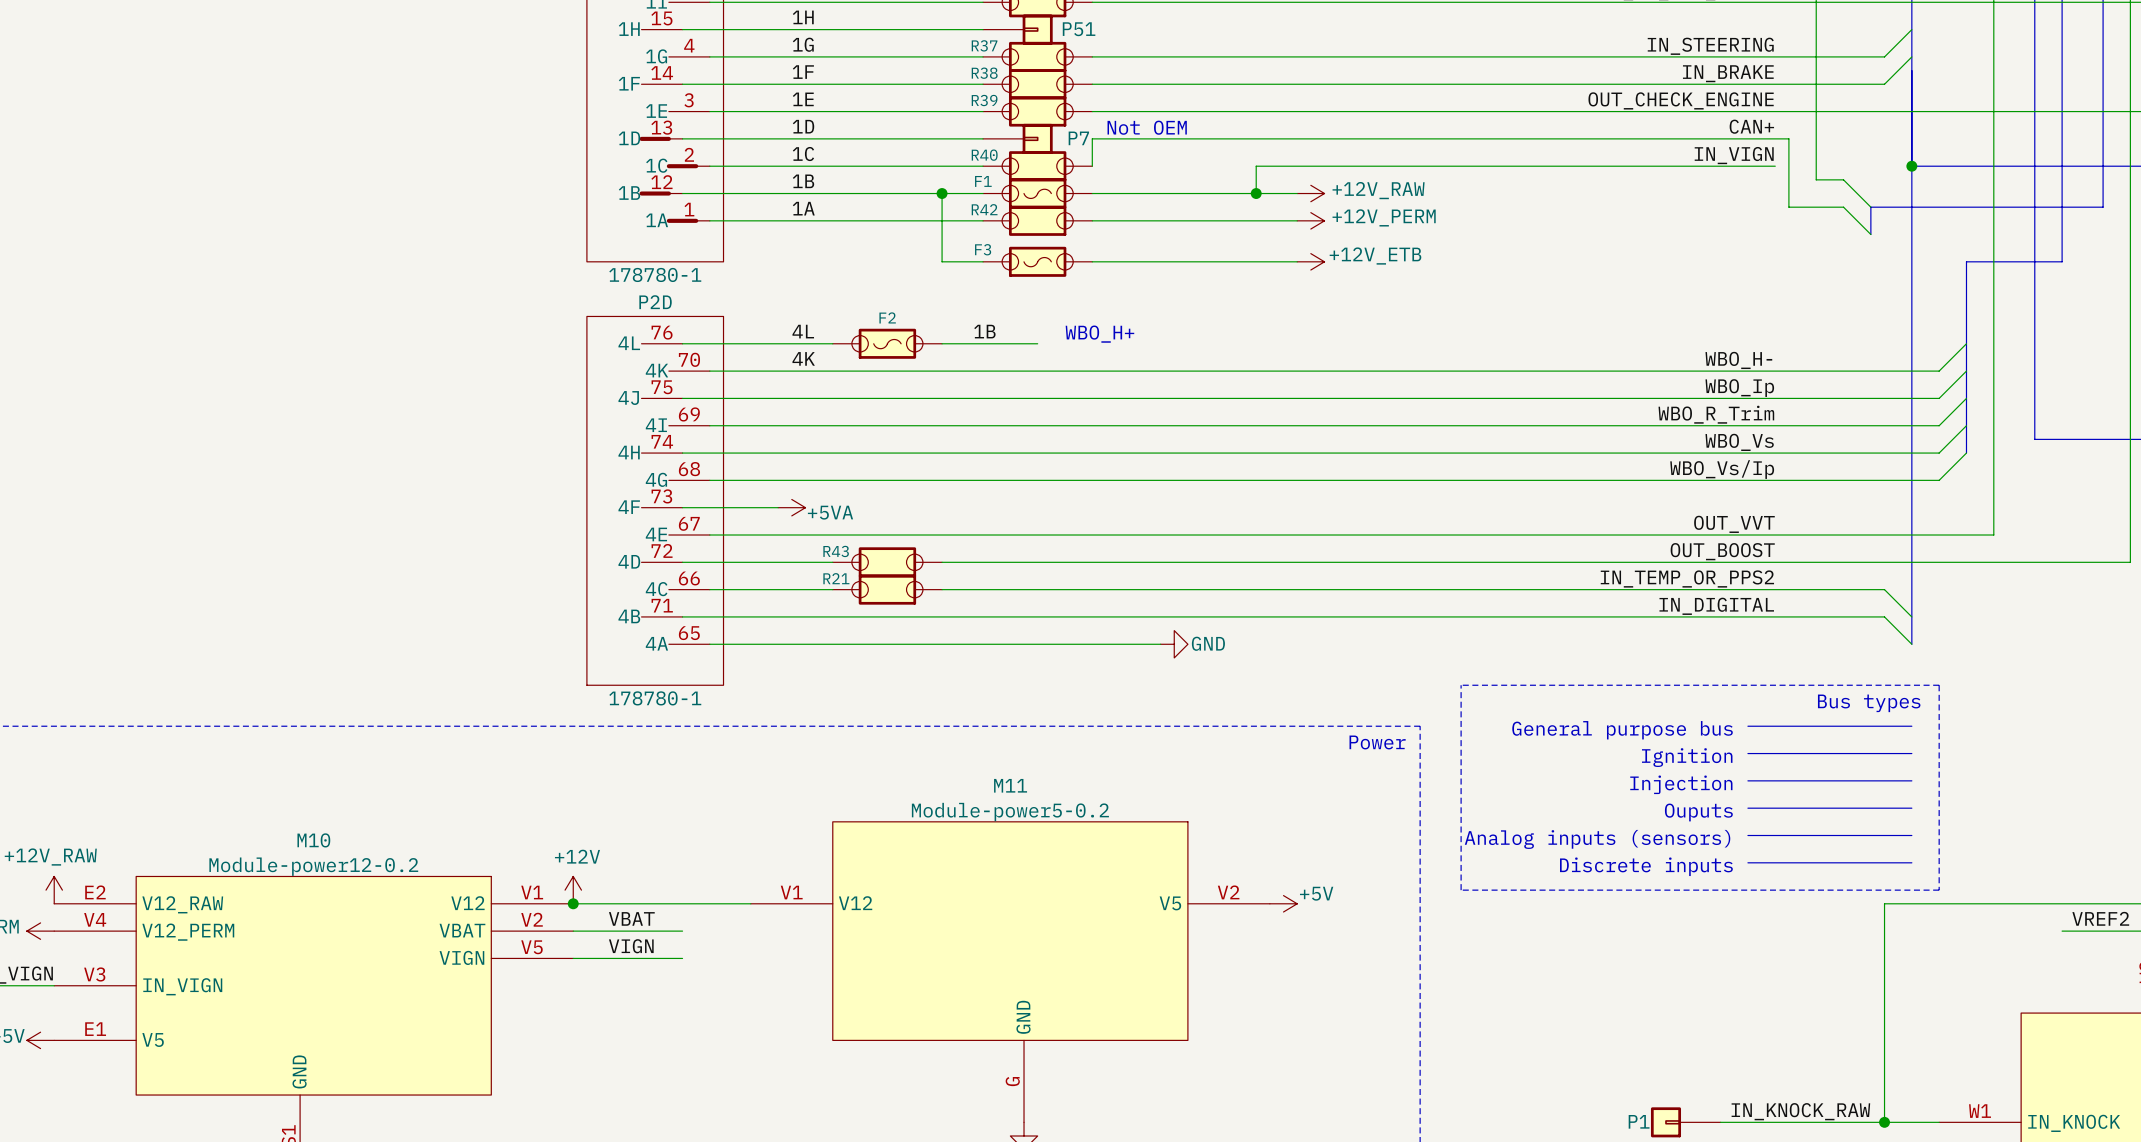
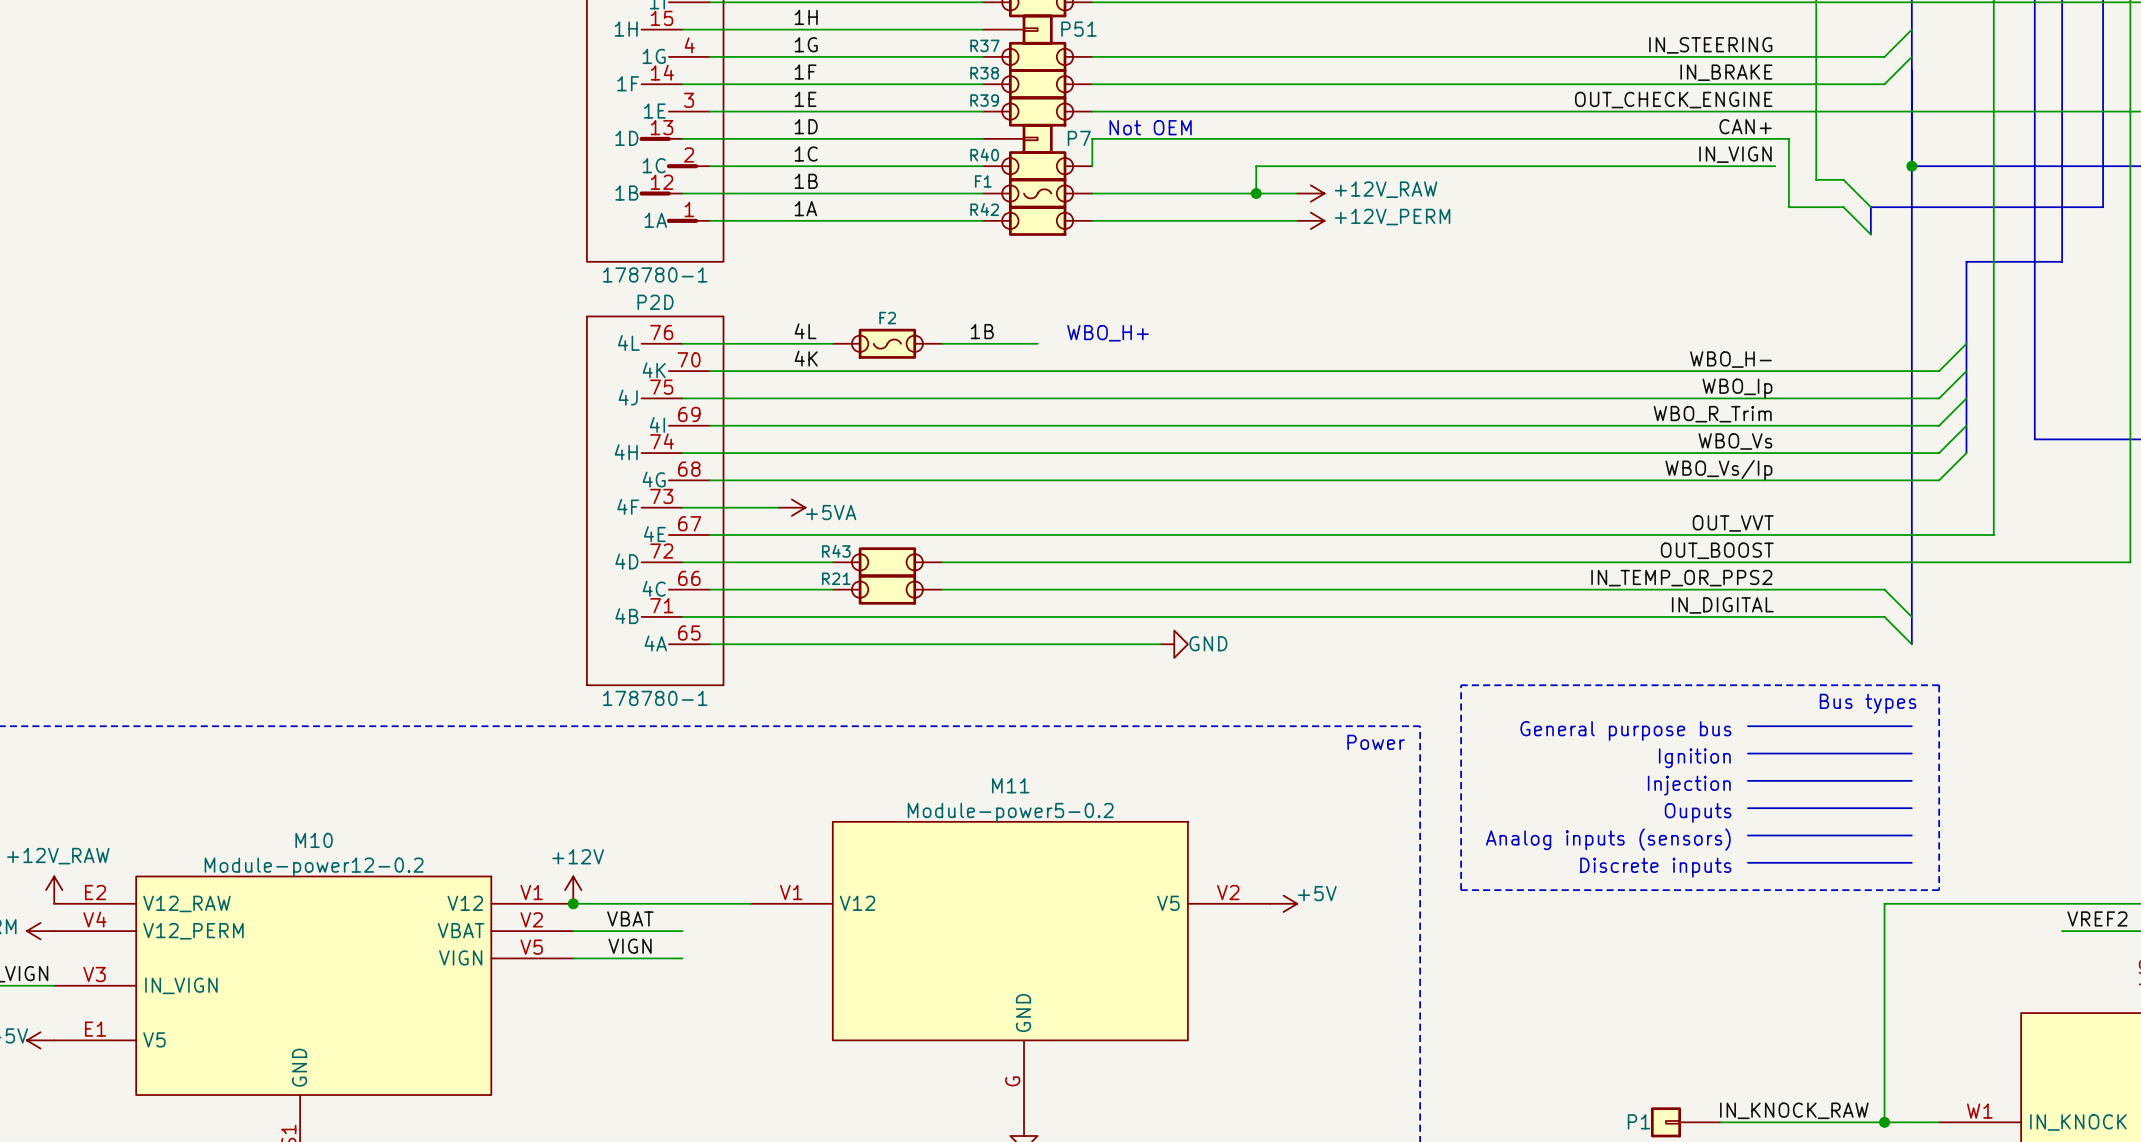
wire: (942, 193) (942, 261) (983, 261) -> none
junction: (942, 193) -> none
F3: (1037, 261) -> none
wire: (1092, 261) (1297, 261) -> none
power symbol: +12V_ETB (1310, 261) -> none

